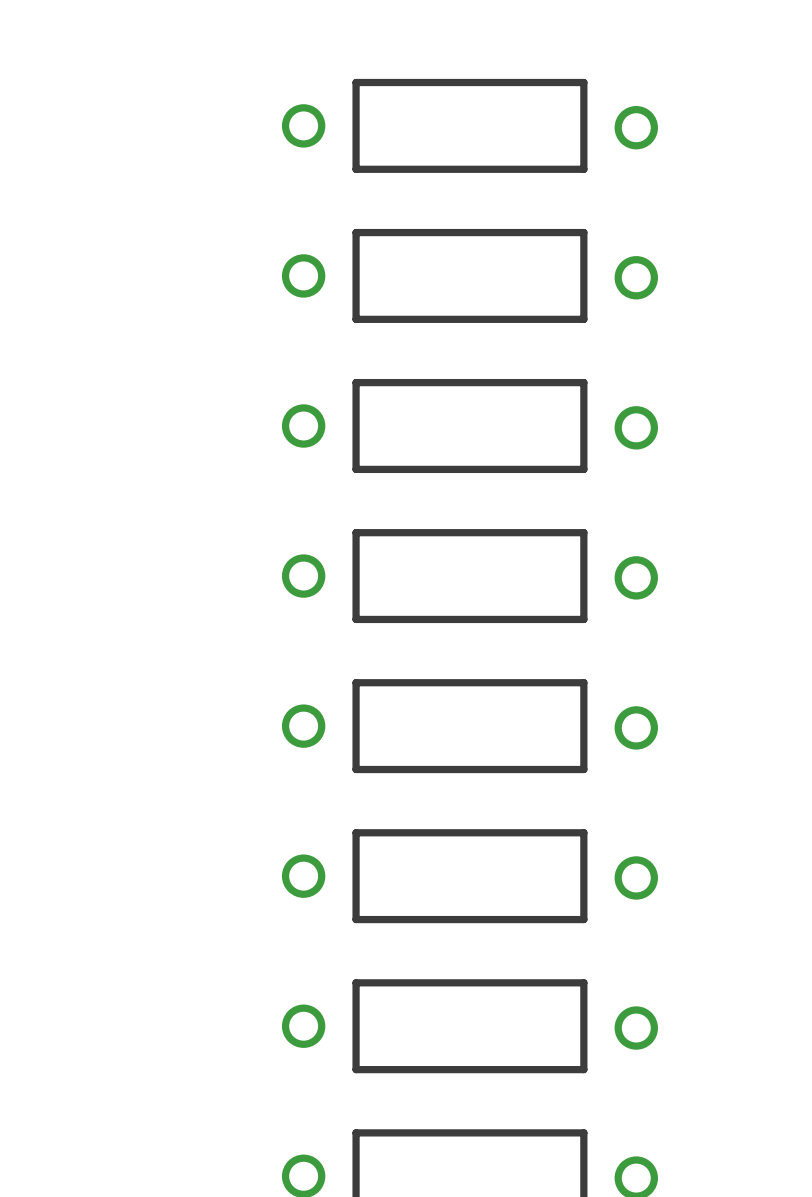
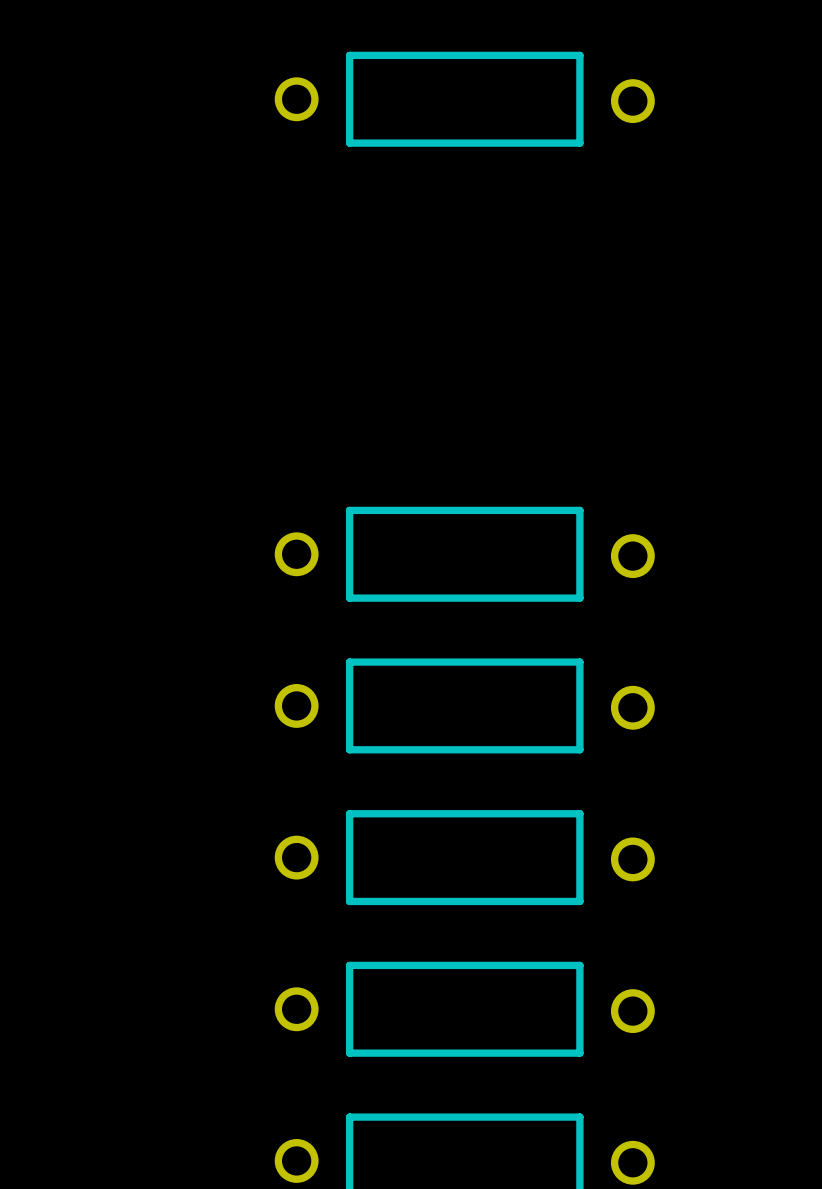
part: (469, 275) -> none
part: (469, 426) -> none

